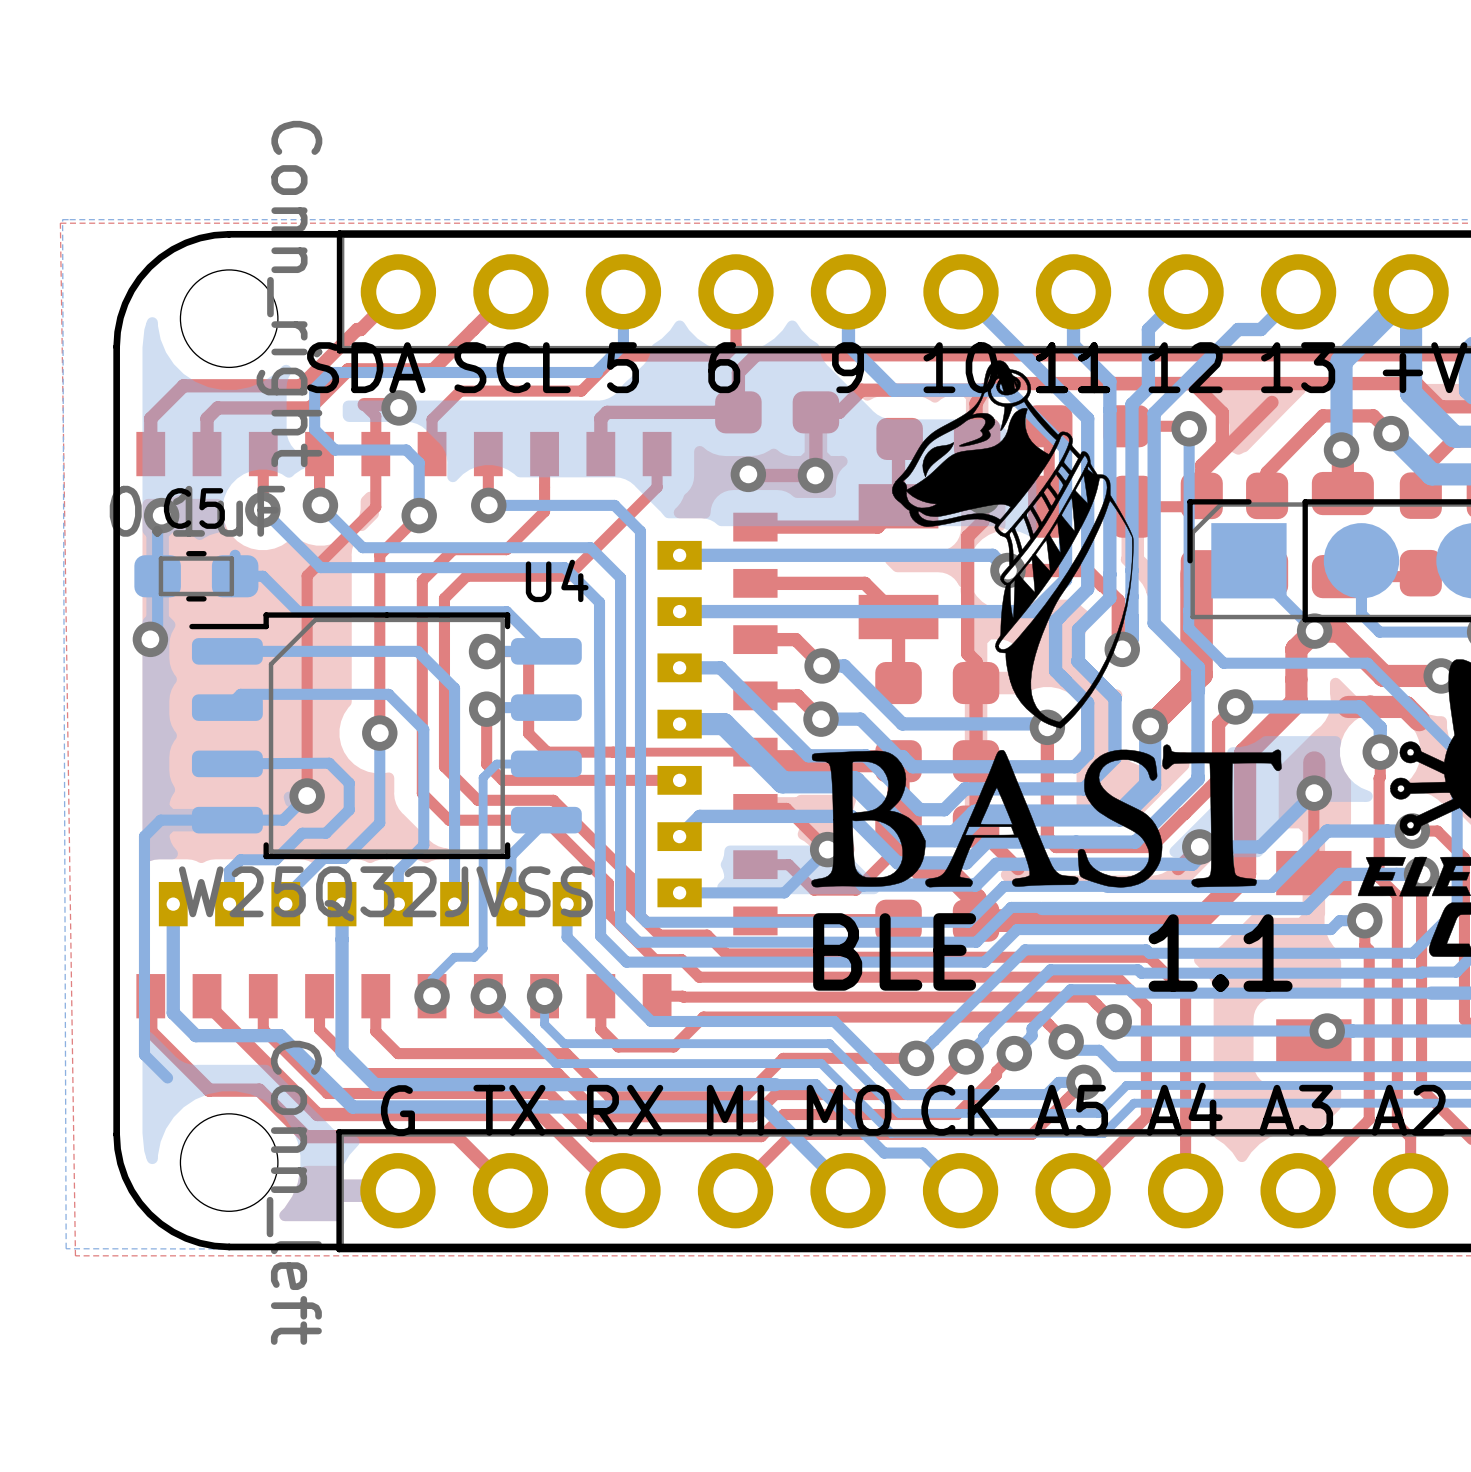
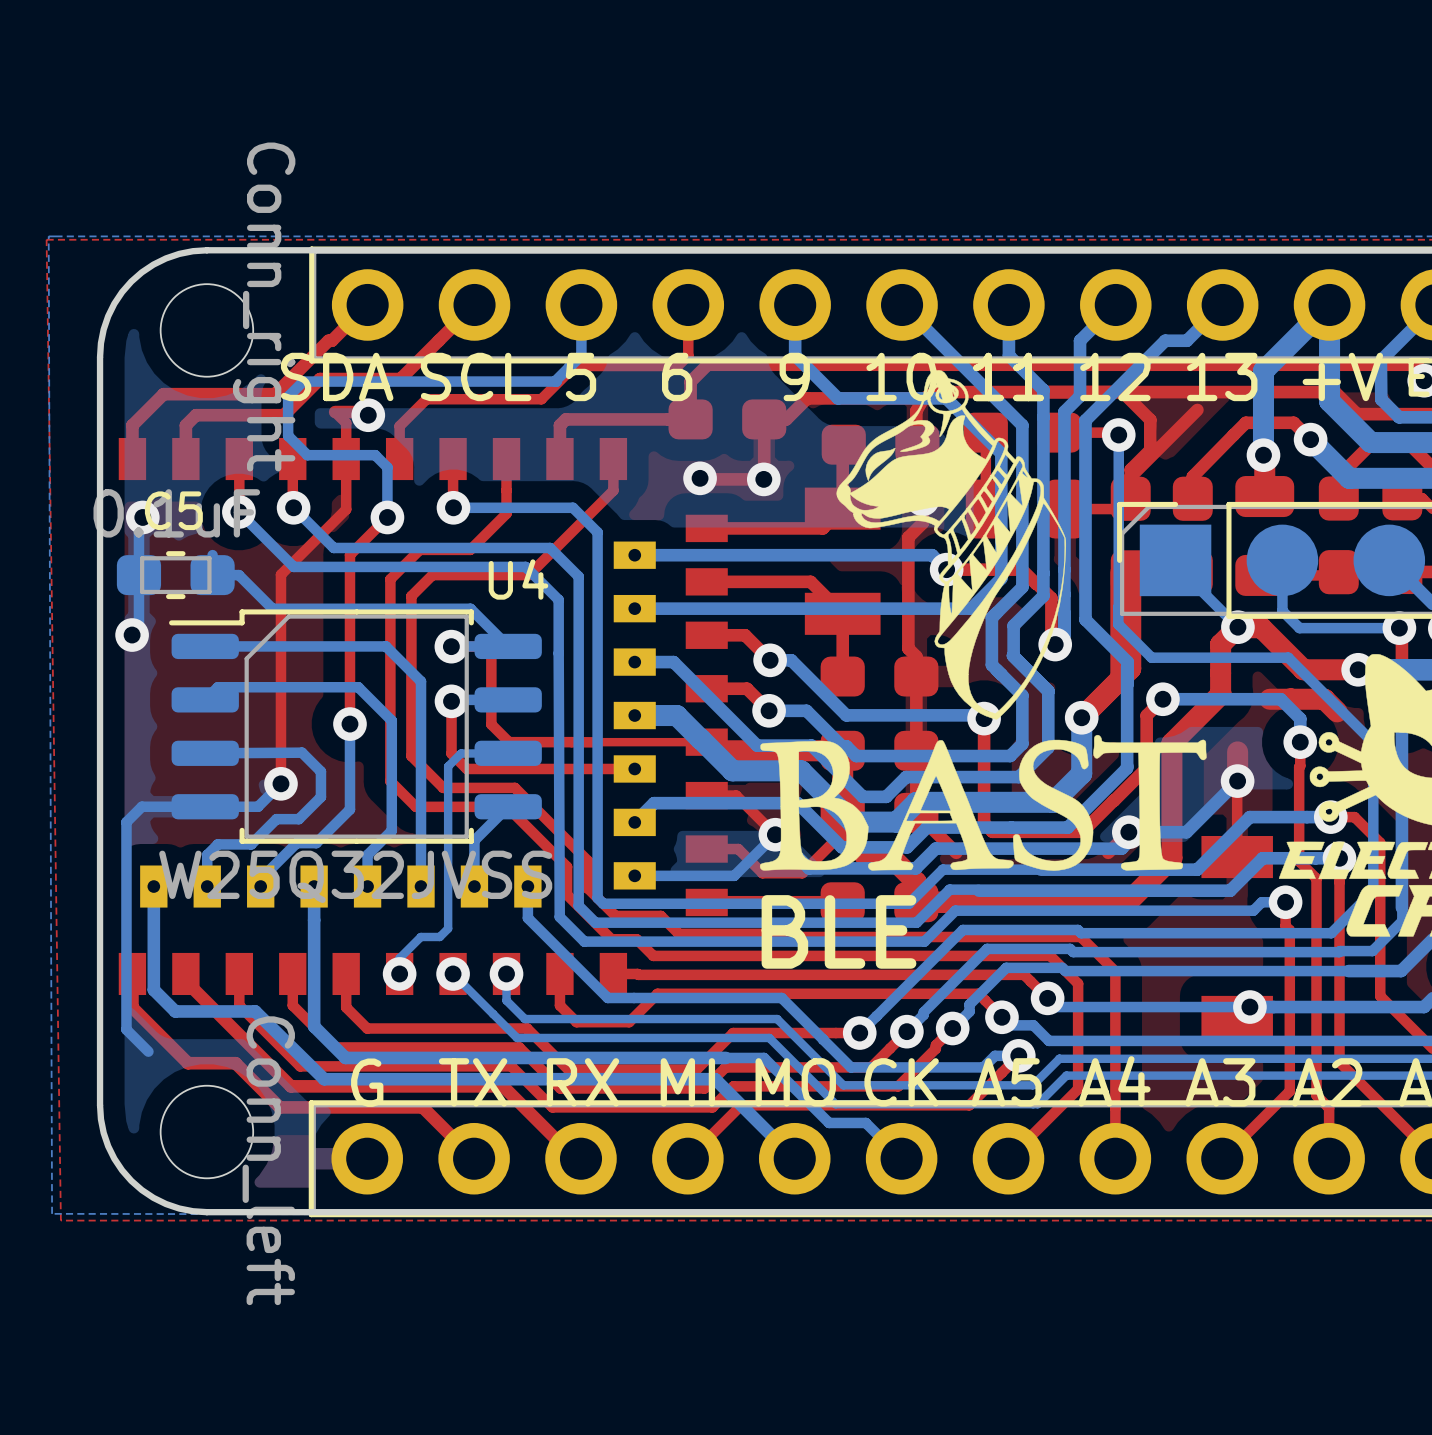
text: 1.1 (1220, 952) -> none

